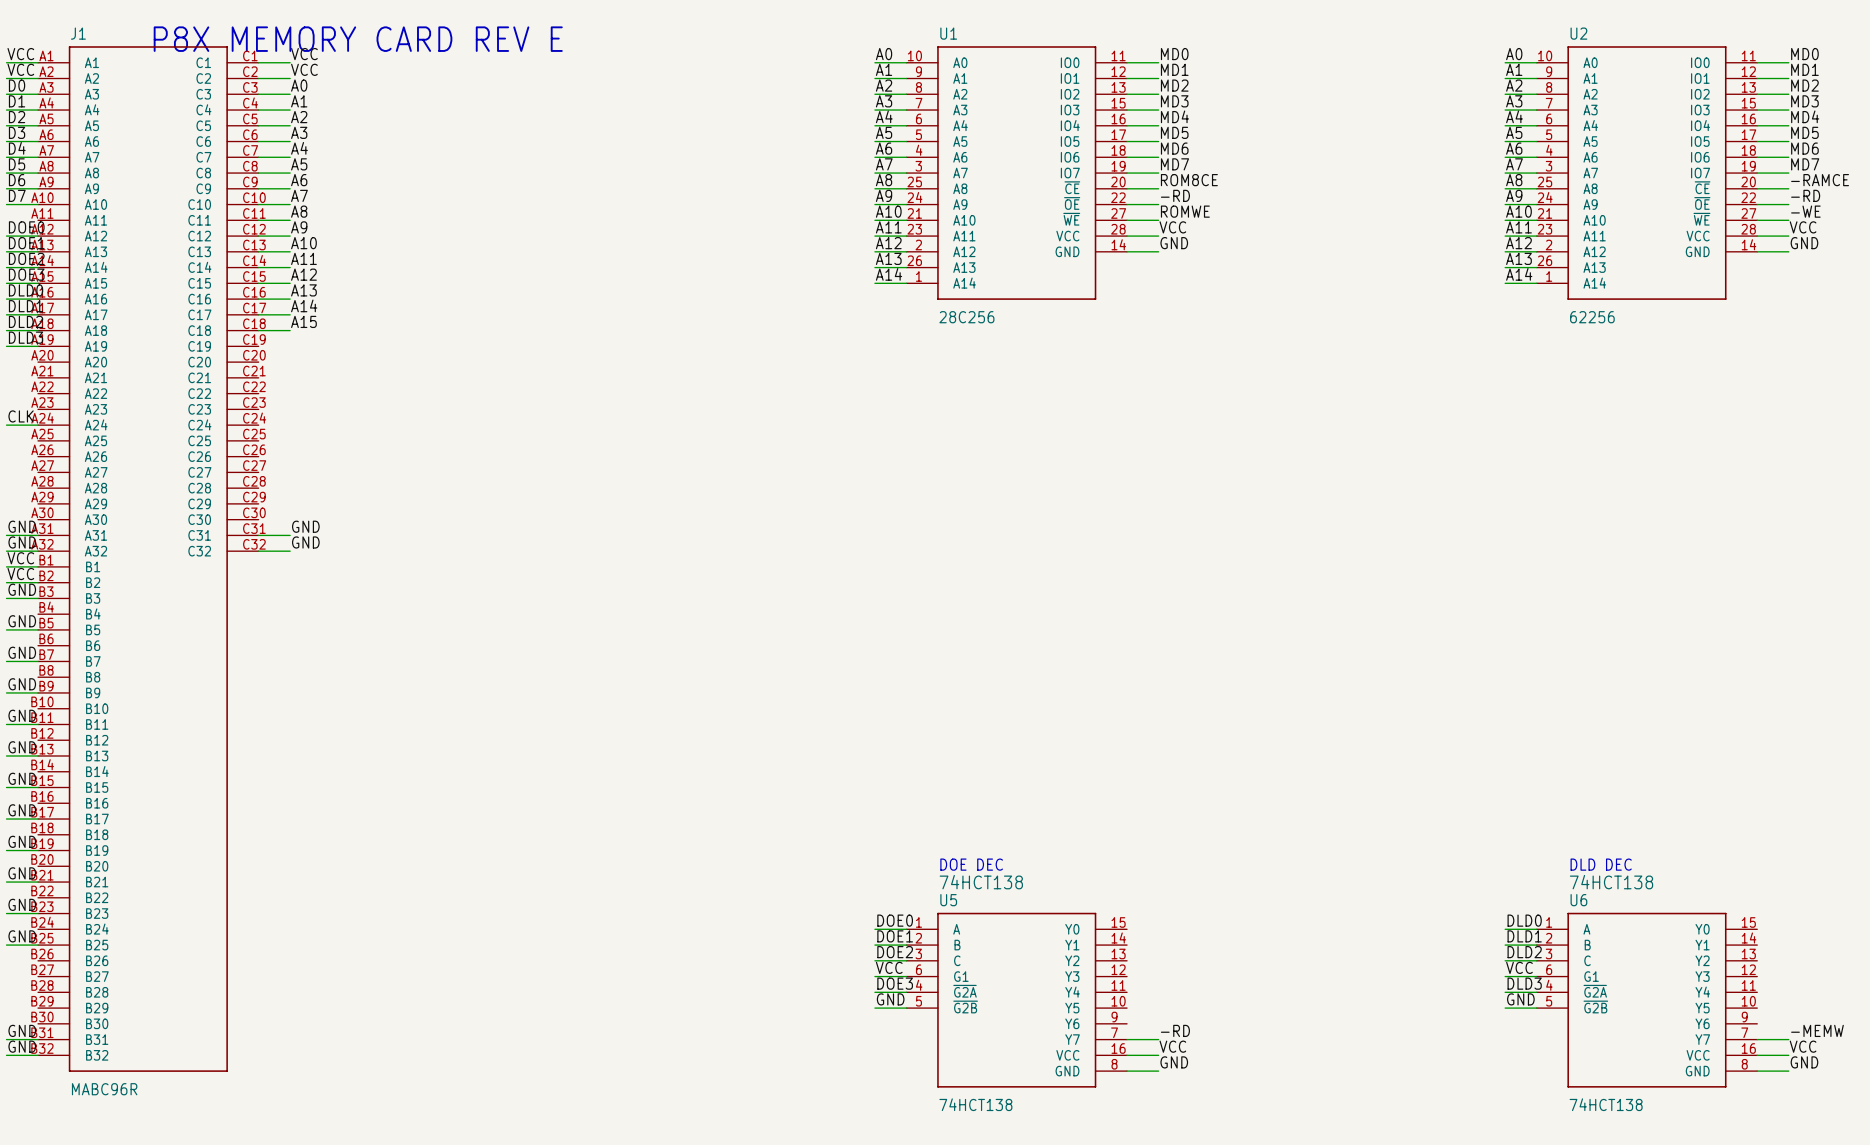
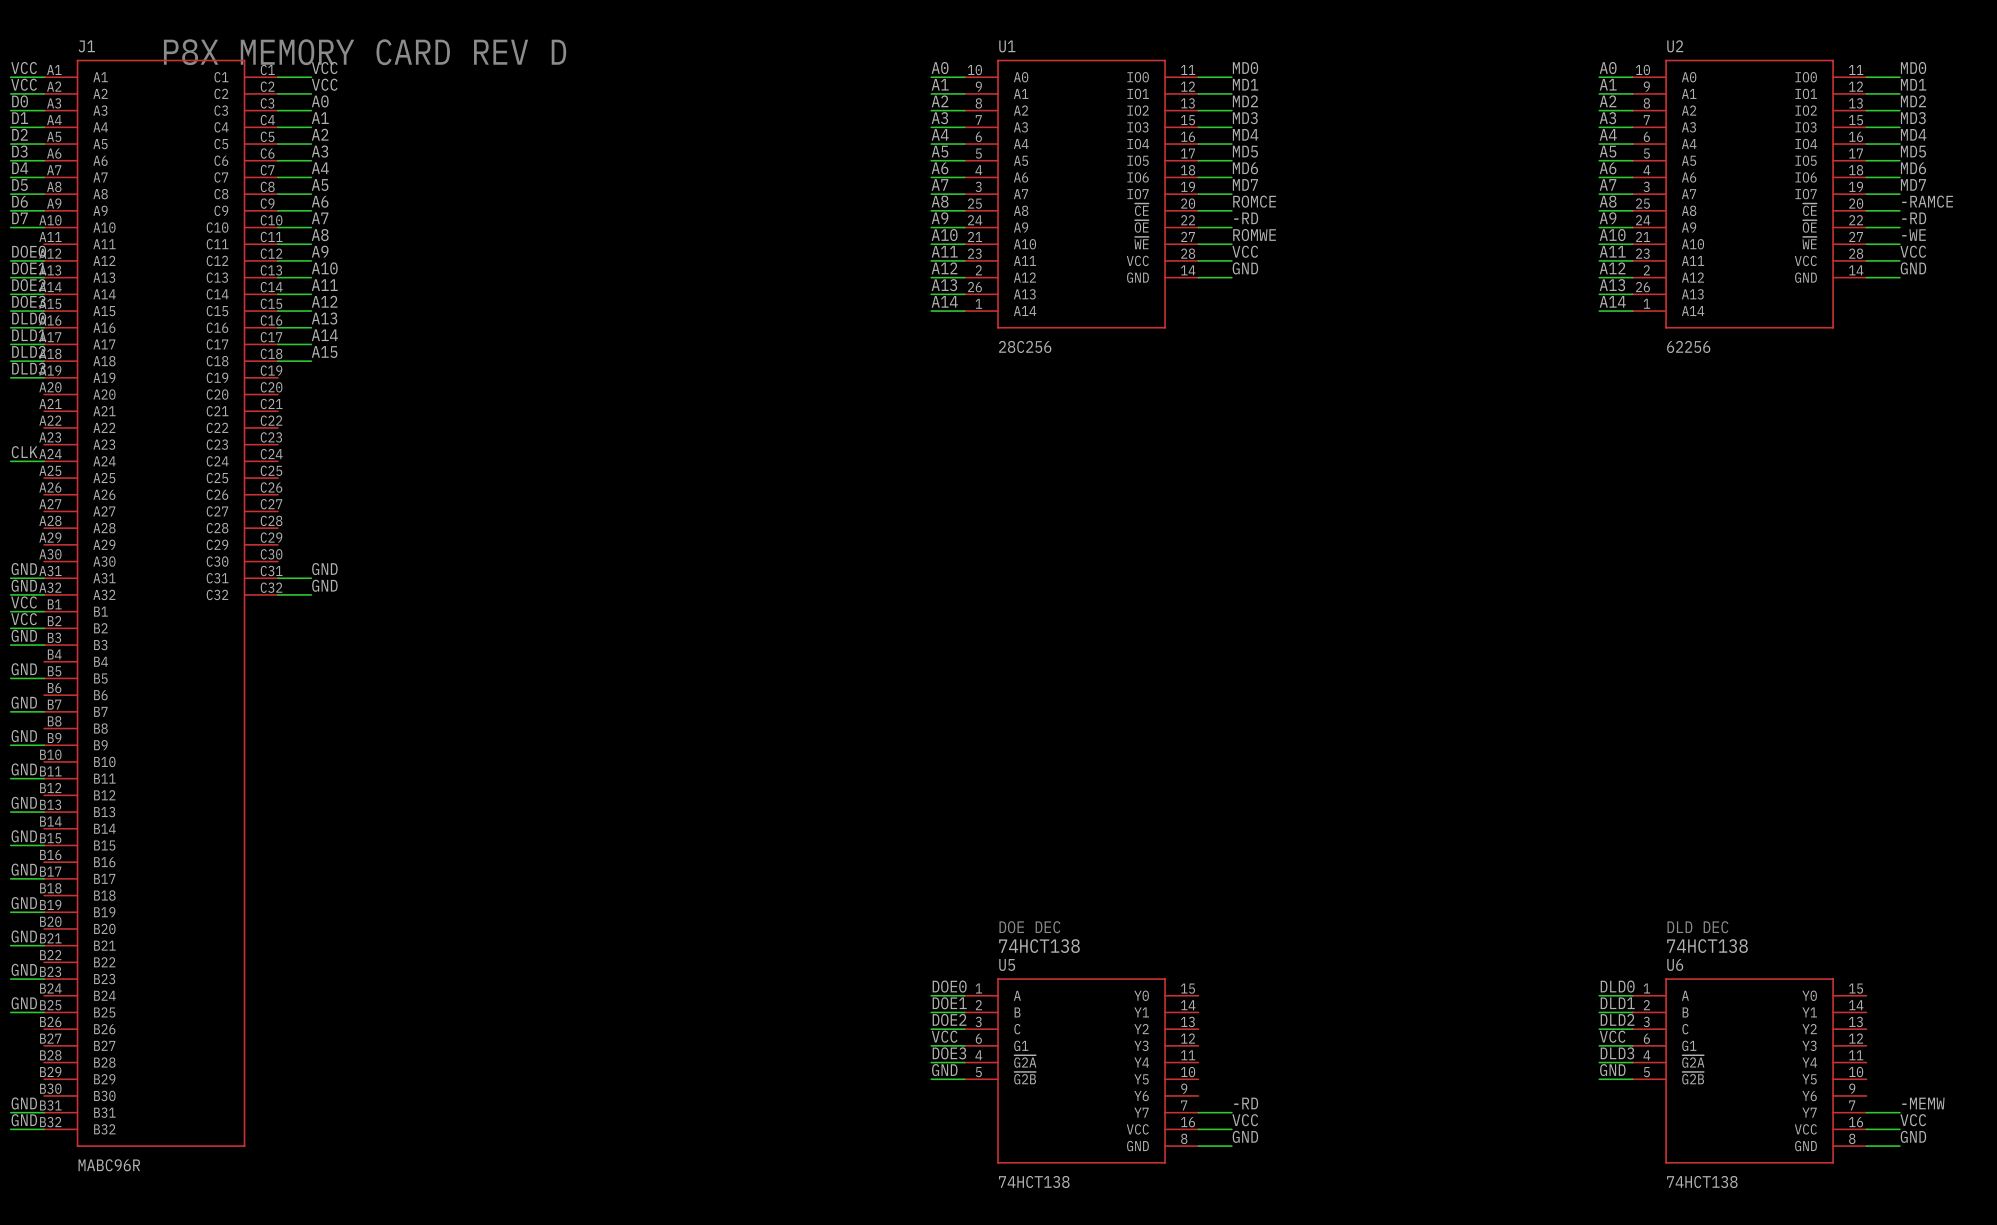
text: P8X MEMORY CARD REV E (358, 39) -> P8X MEMORY CARD REV D (365, 52)
label: ROM8CE (1189, 180) -> ROMCE (1254, 201)

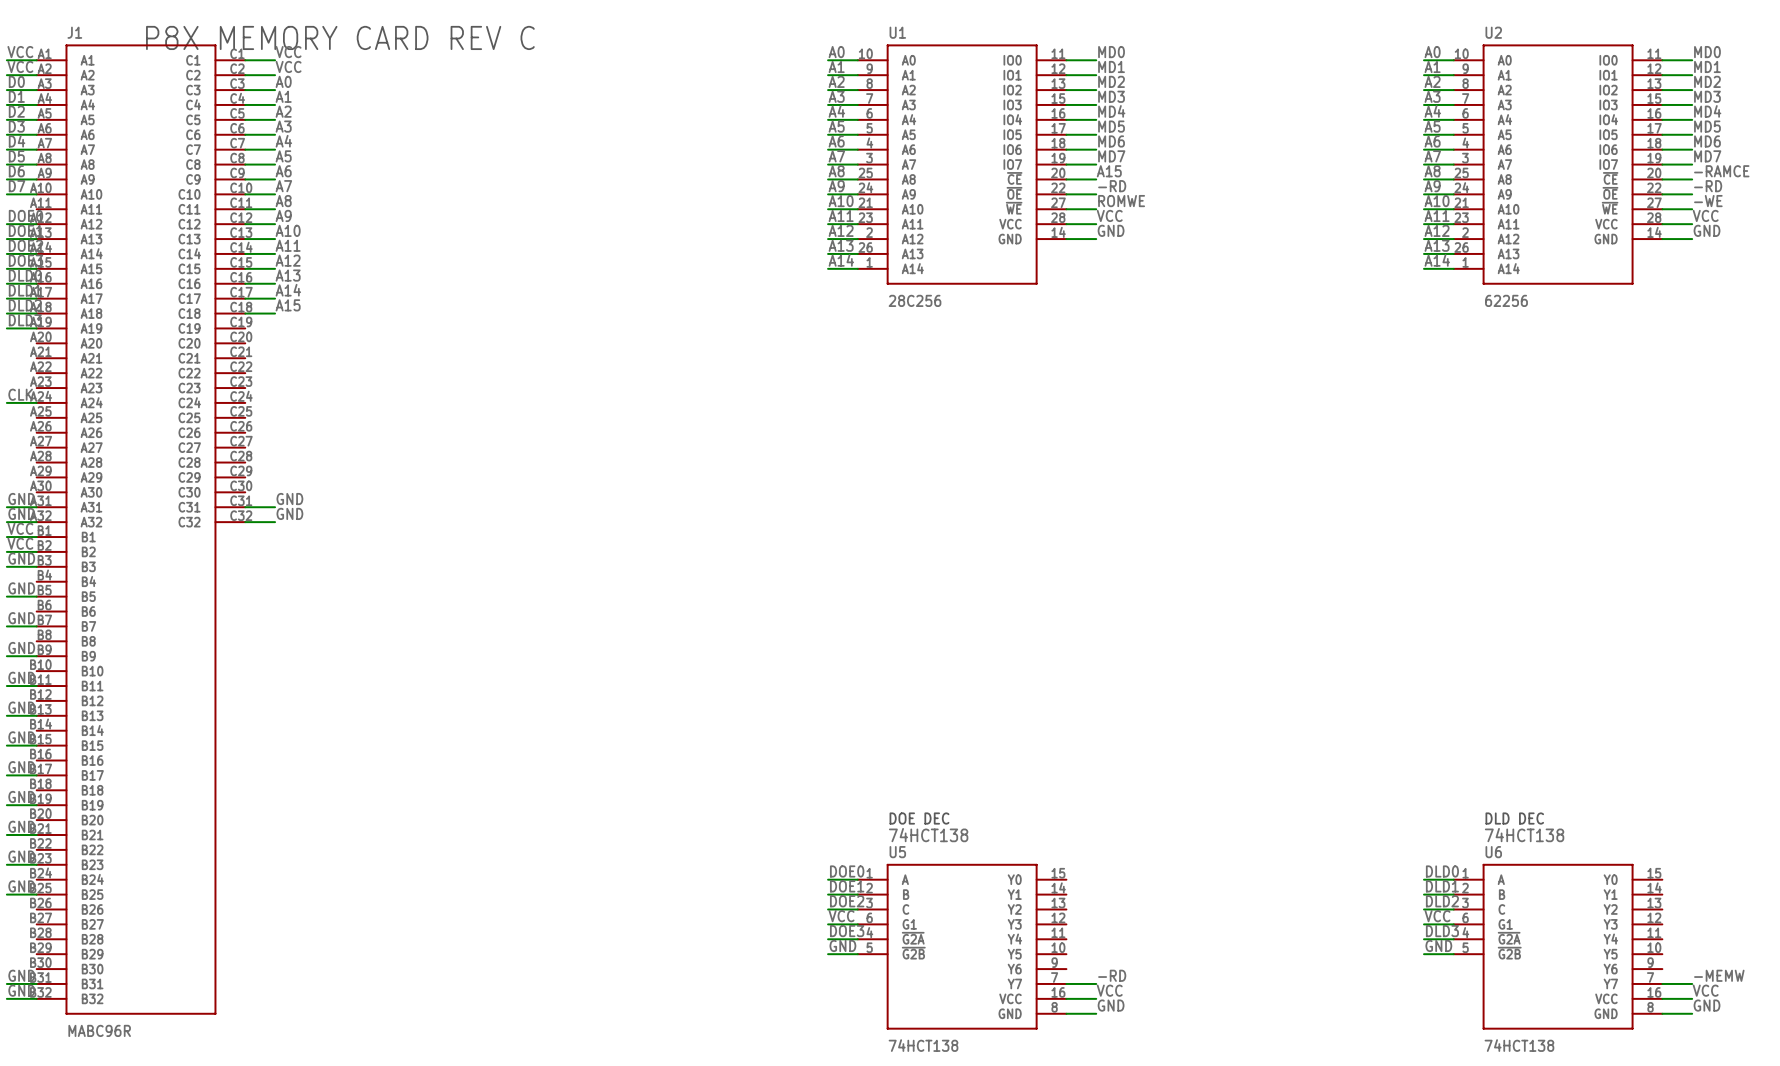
text: P8X MEMORY CARD REV D (365, 52) -> P8X MEMORY CARD REV C (340, 37)
label: ROMCE (1254, 201) -> A15 (1109, 171)

